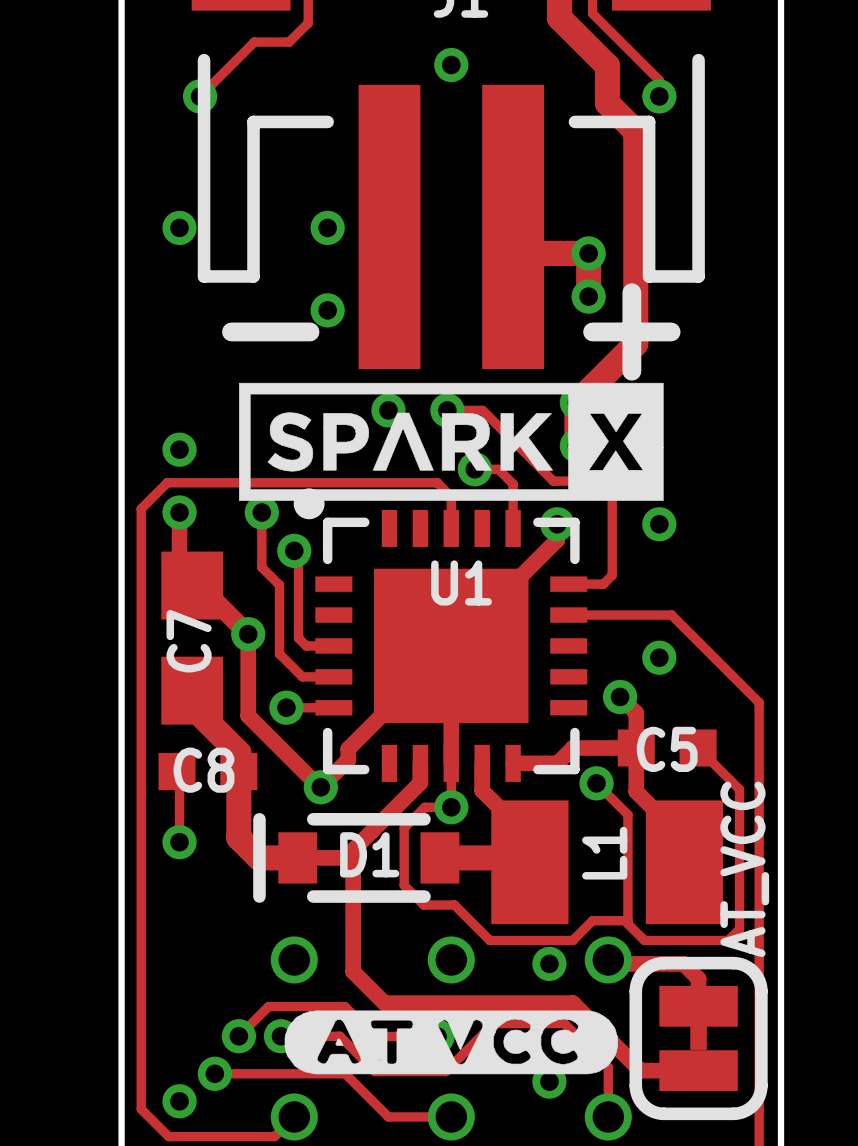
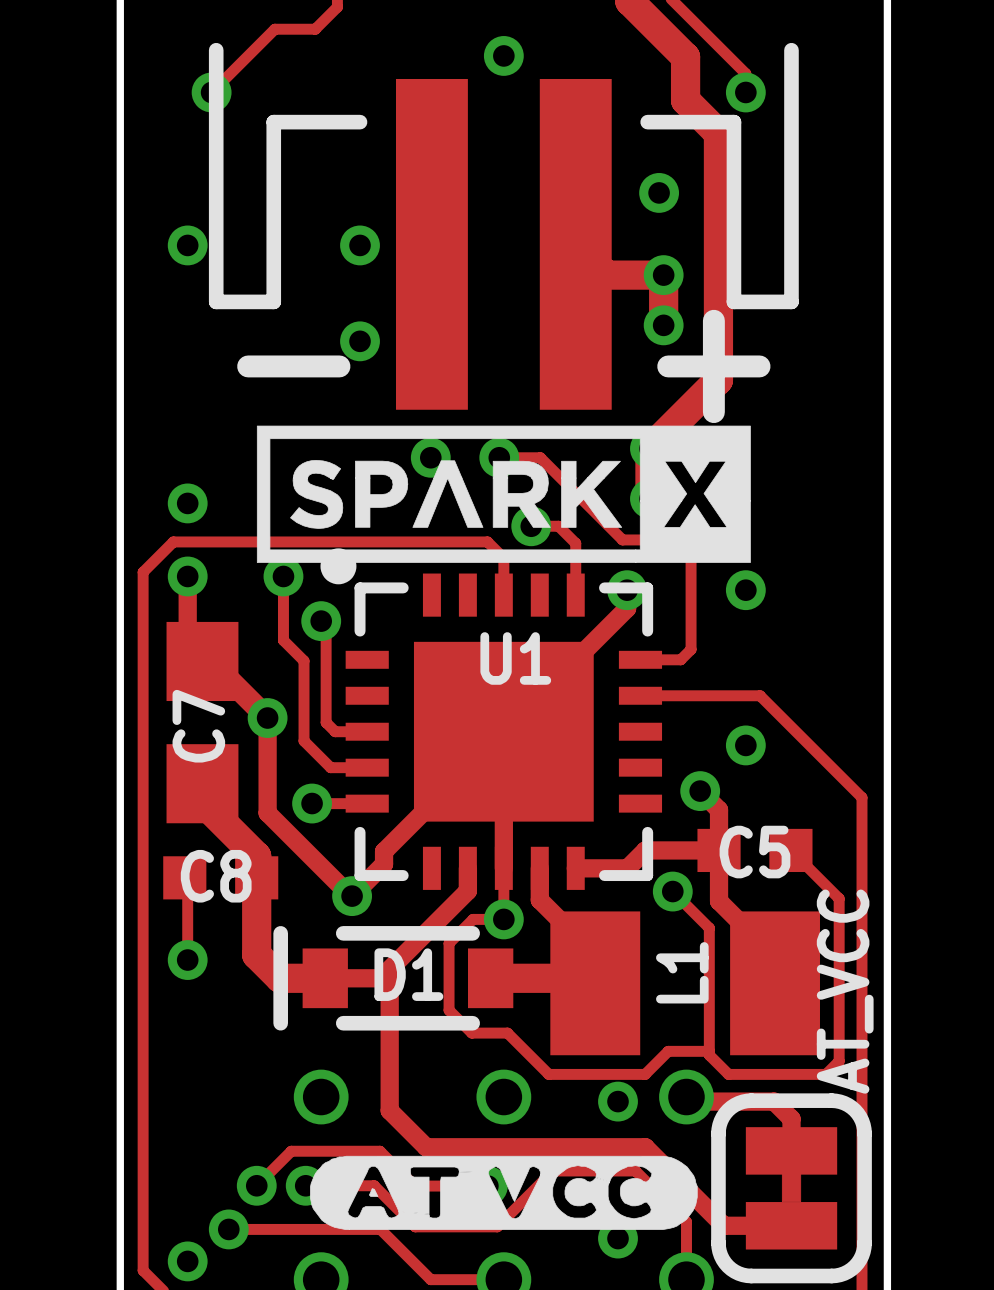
via: none -> (659, 192)

